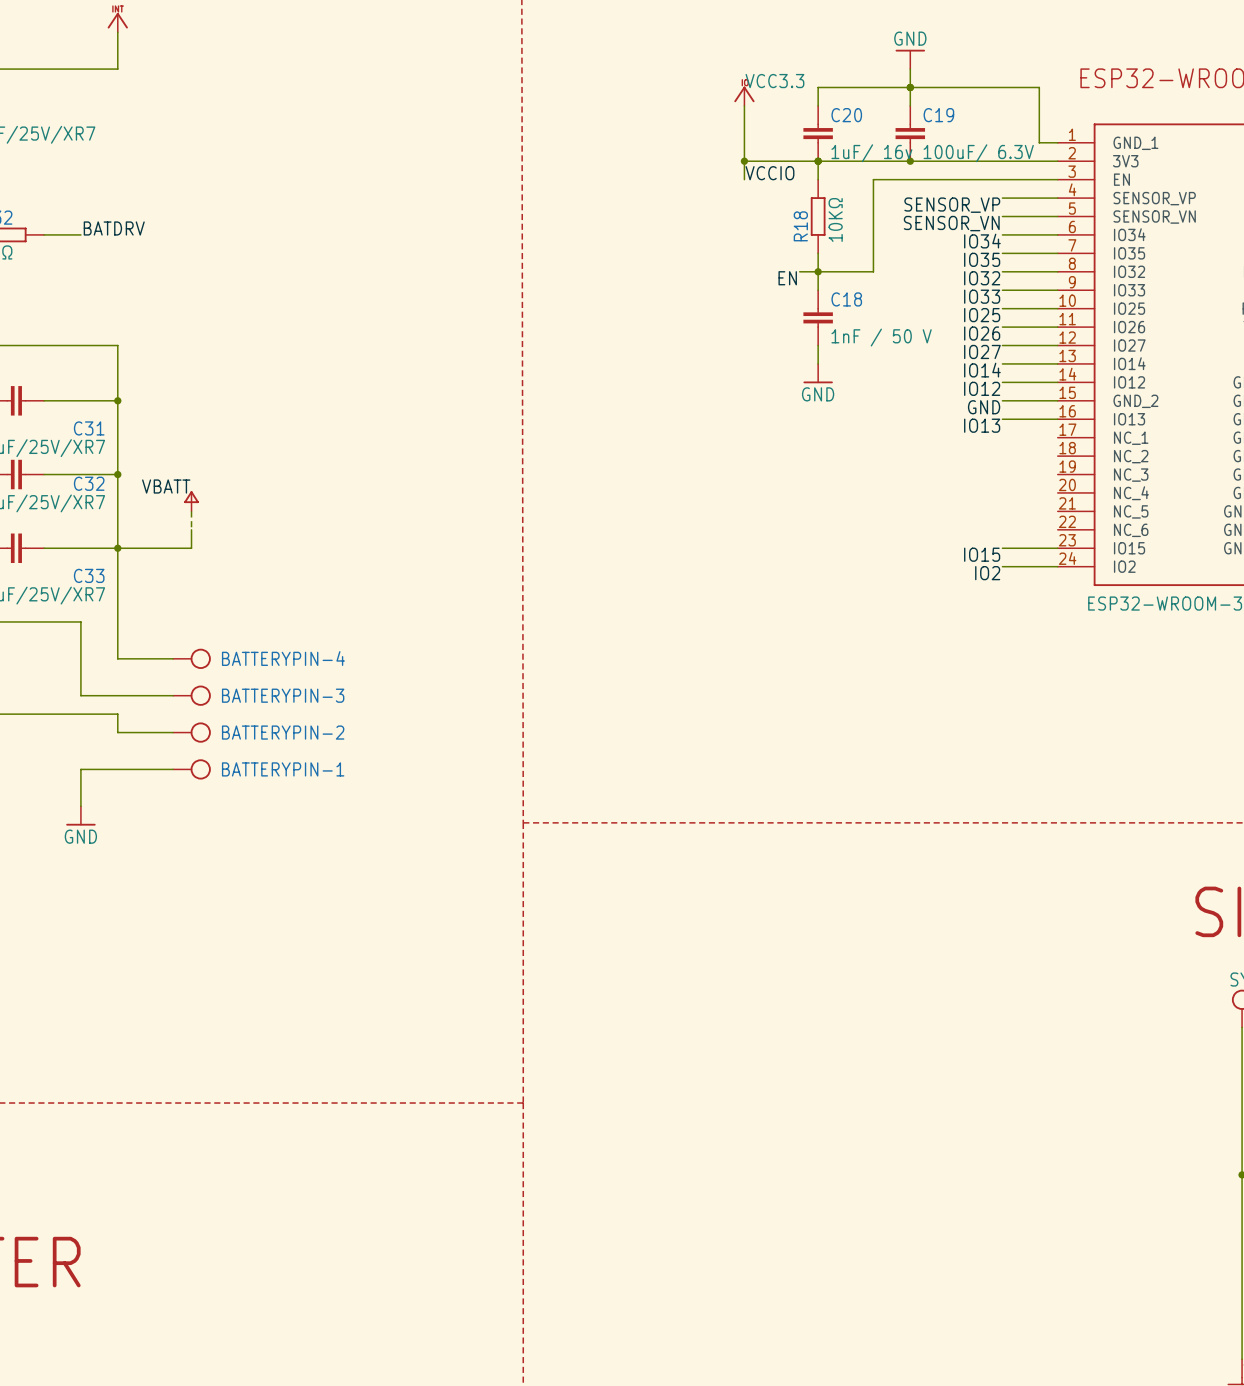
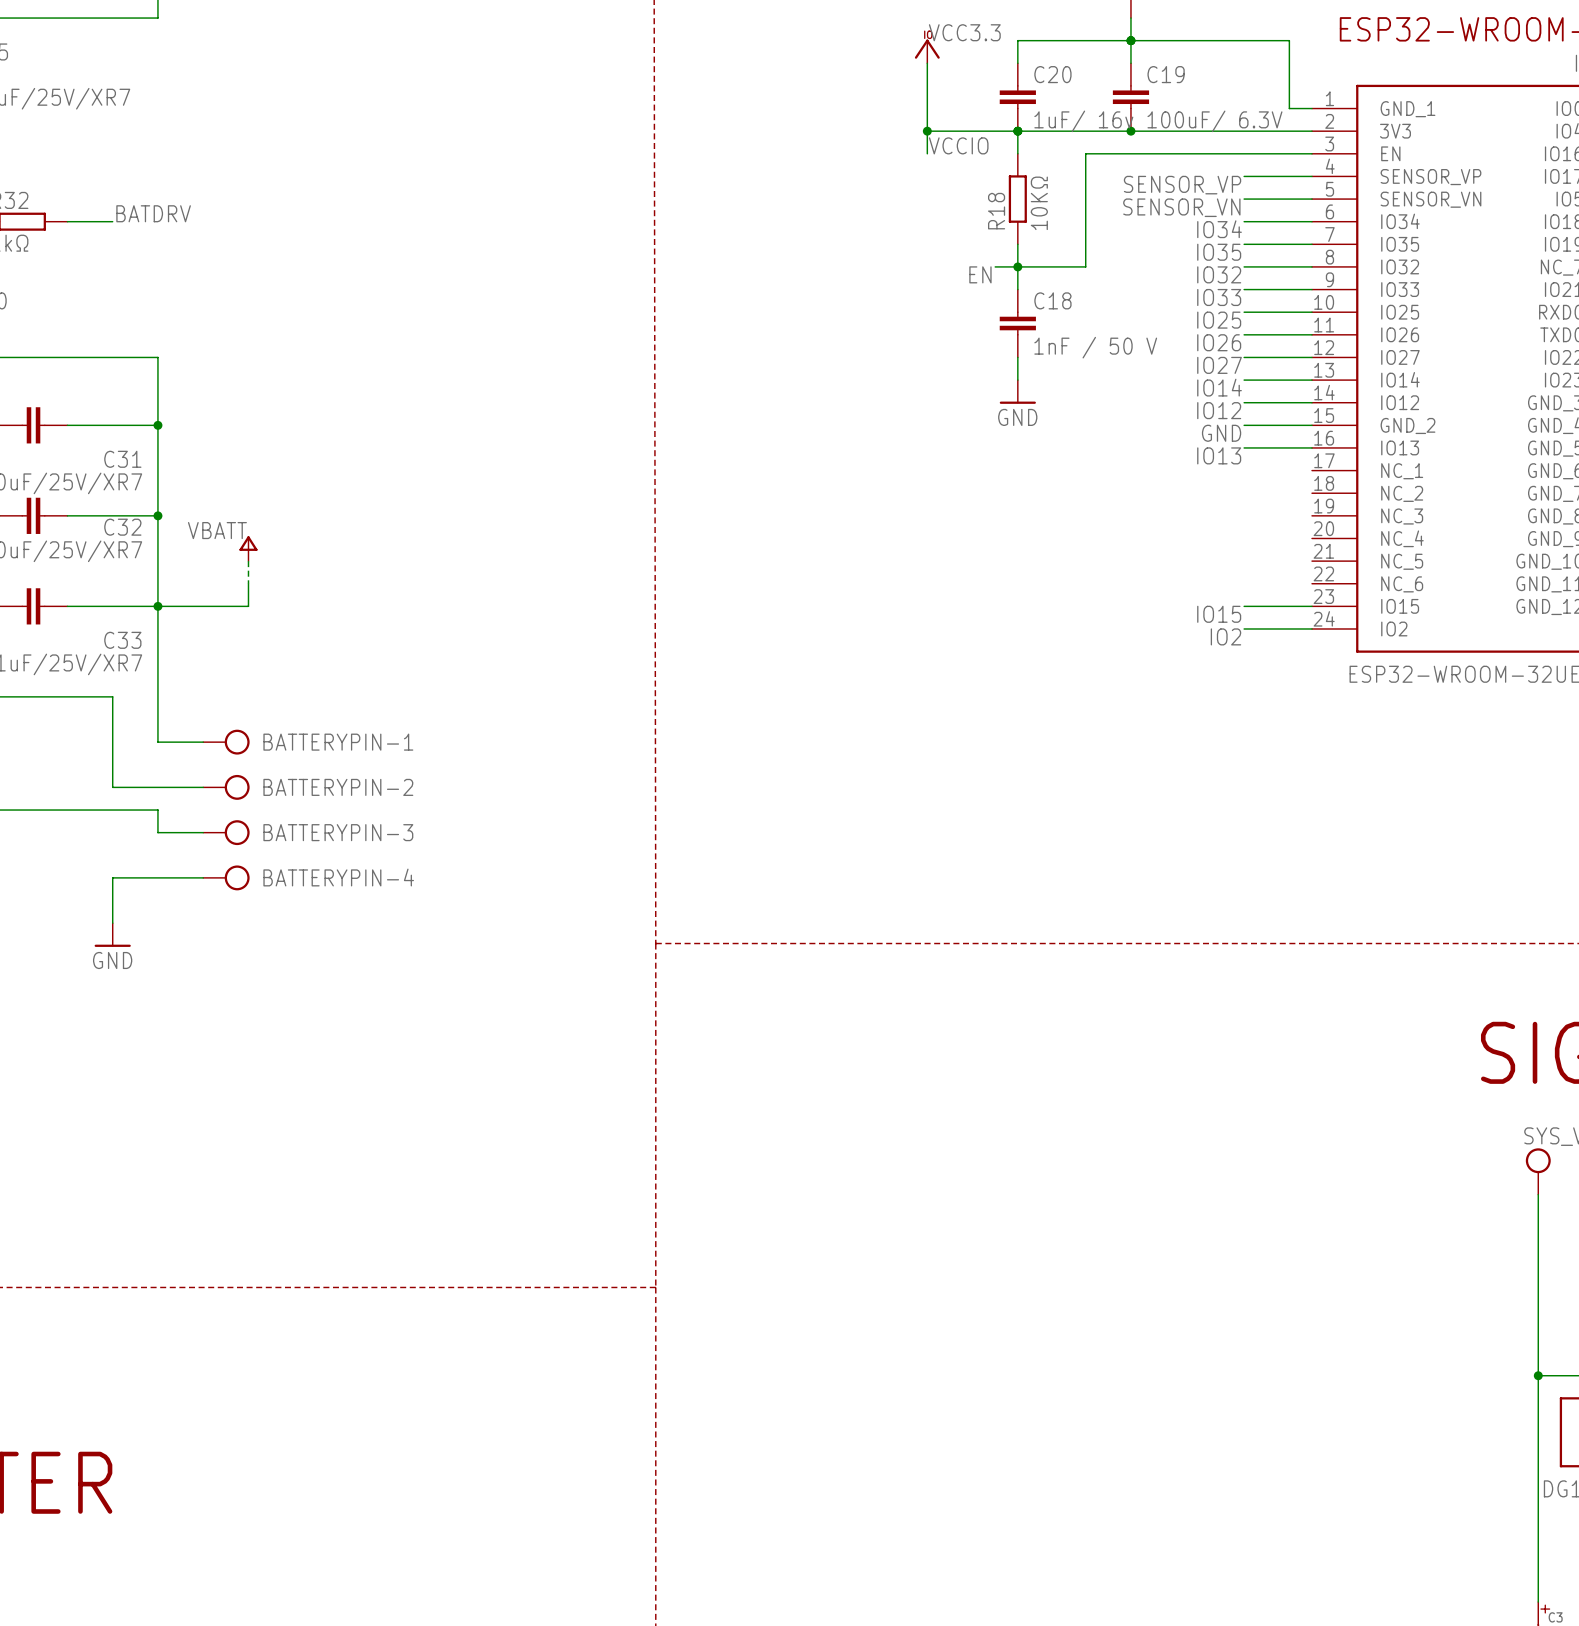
BATTERYPIN-4 position: (191, 658) -> (226, 877)
BATTERYPIN-3 position: (191, 695) -> (226, 832)
BATTERYPIN-2 position: (191, 732) -> (226, 787)
BATTERYPIN-1 position: (191, 769) -> (226, 742)

